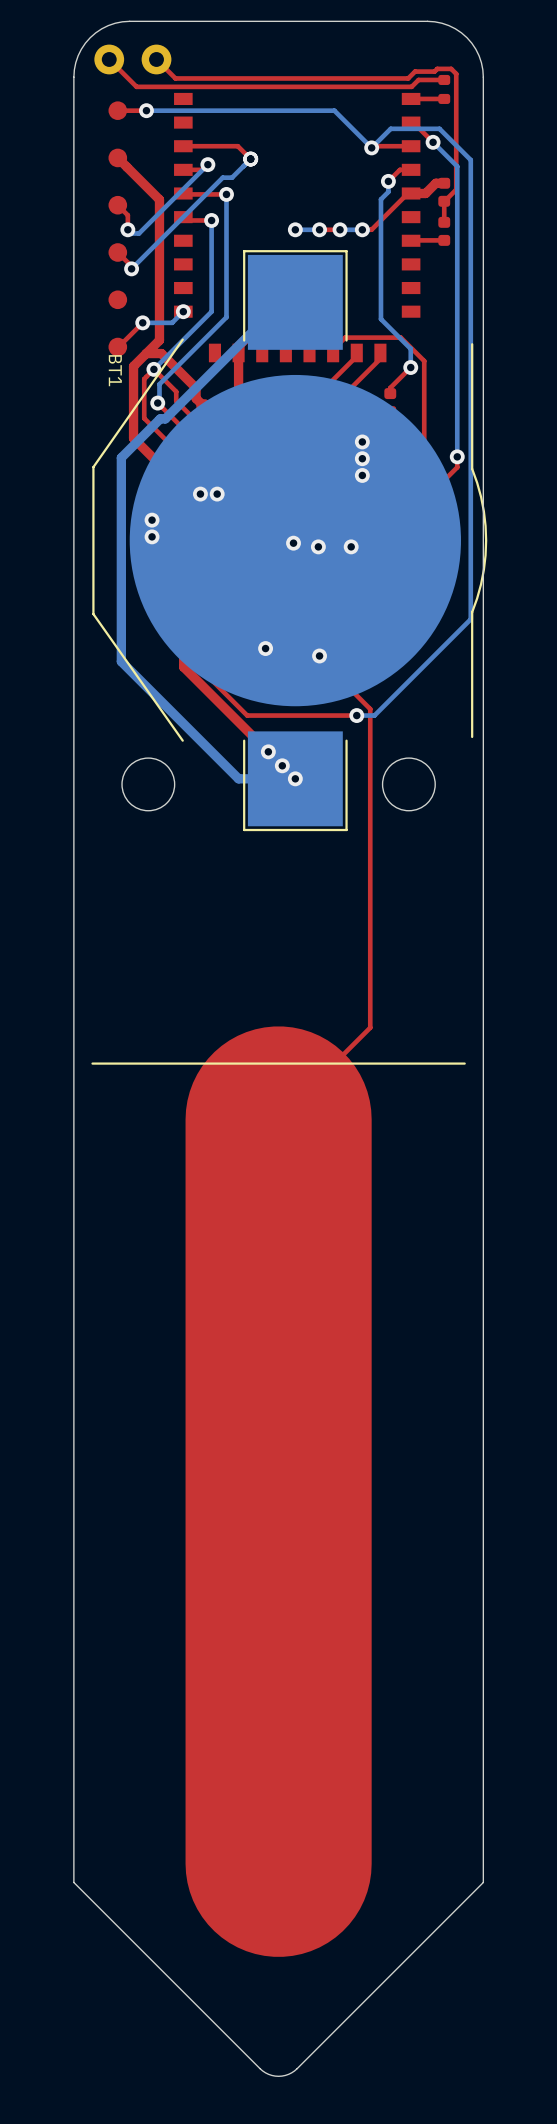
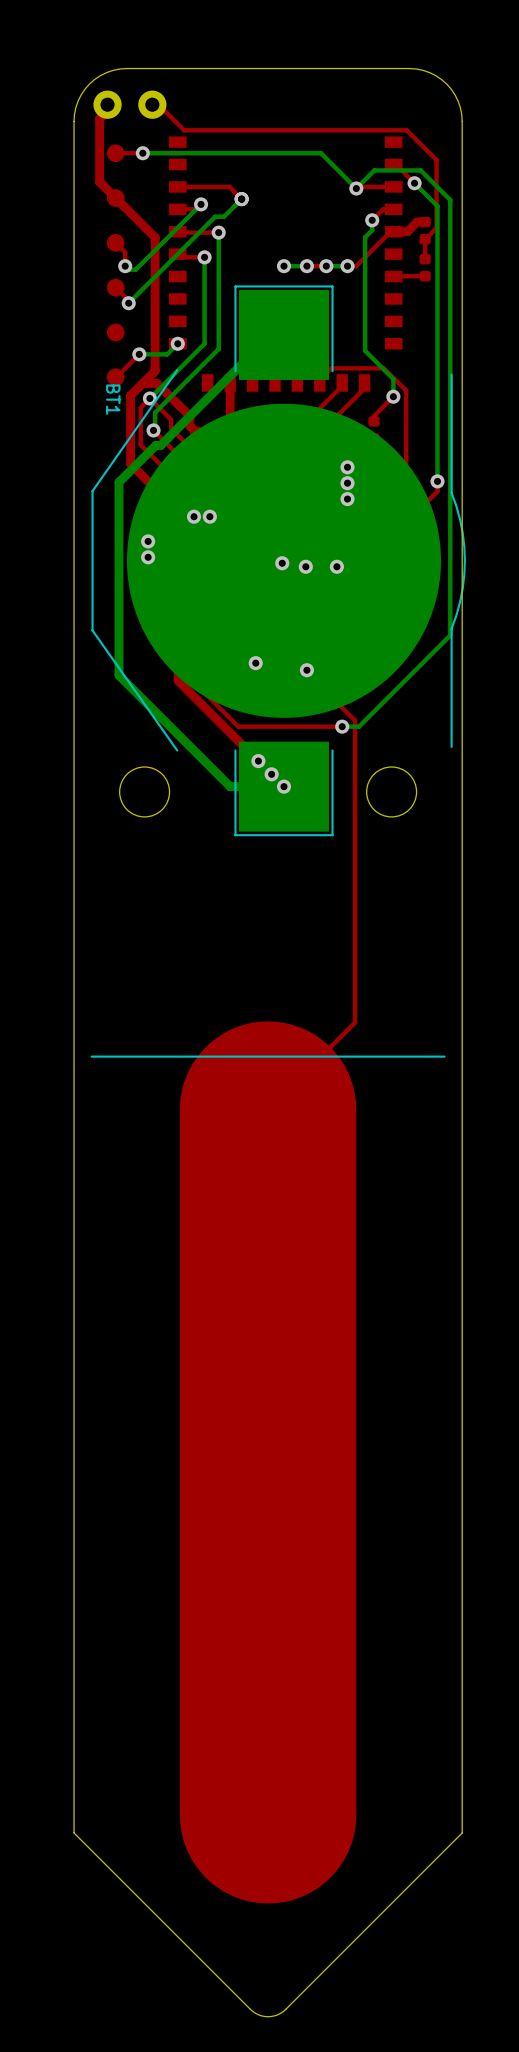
top track: (109, 59) (136, 86) (411, 86) (418, 79) (444, 79) -> none
top track: none -> (113, 104) (99, 118) (99, 181) (115, 198)
top track: (156, 59) (175, 78) (408, 78) (415, 71) (451, 68) (456, 73) (456, 117) -> (158, 104) (184, 130) (406, 130) (436, 160)
part: (444, 89) -> none
top track: (444, 98) (411, 98) -> none

